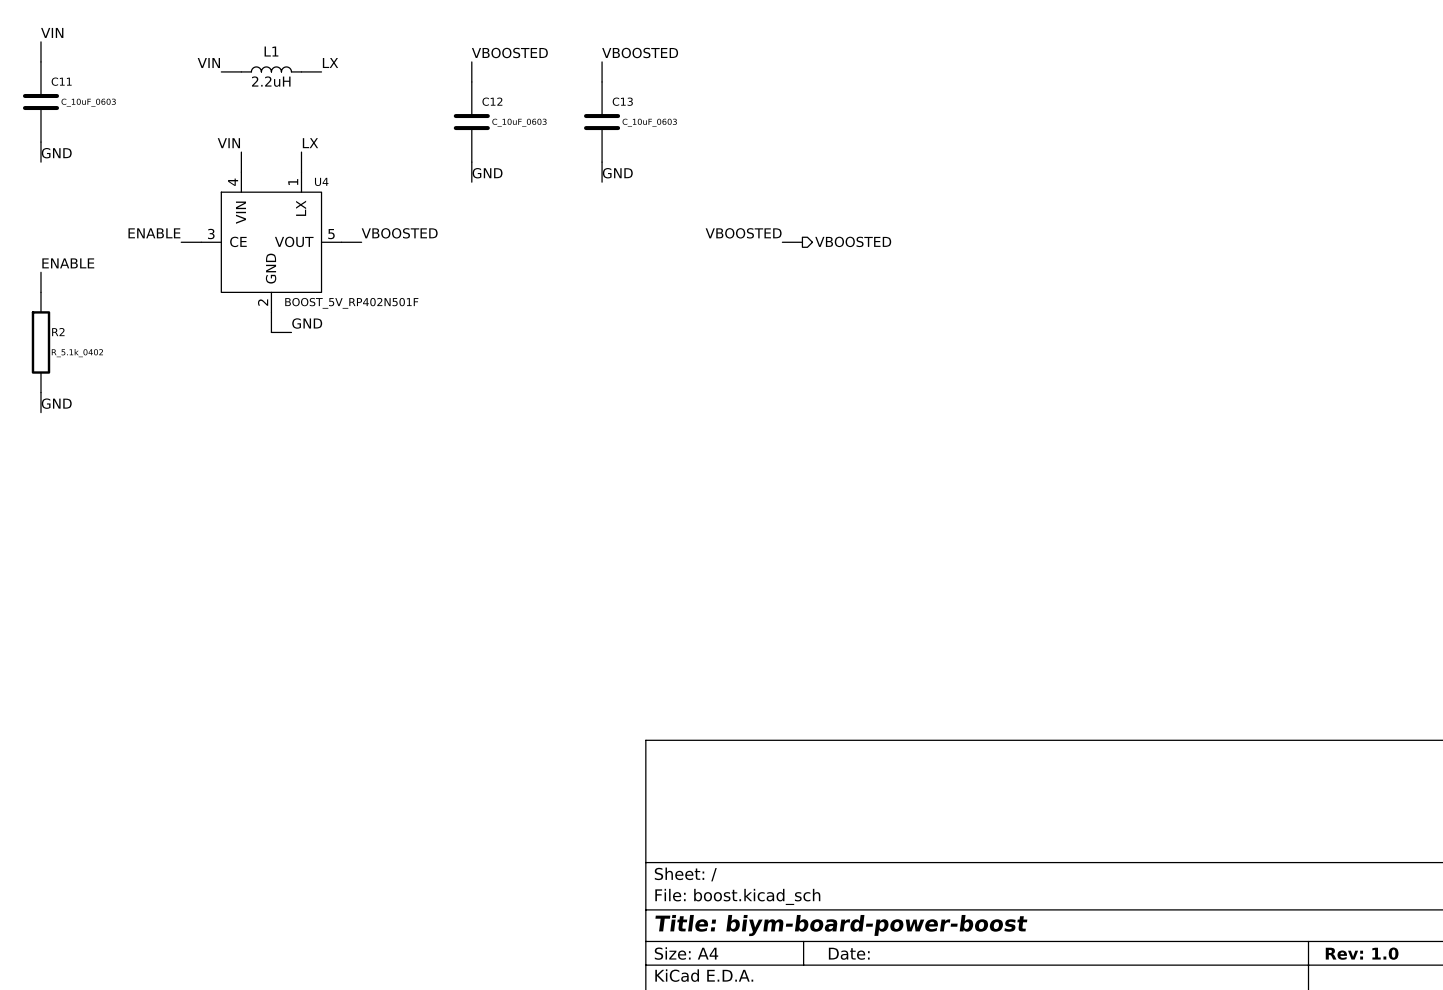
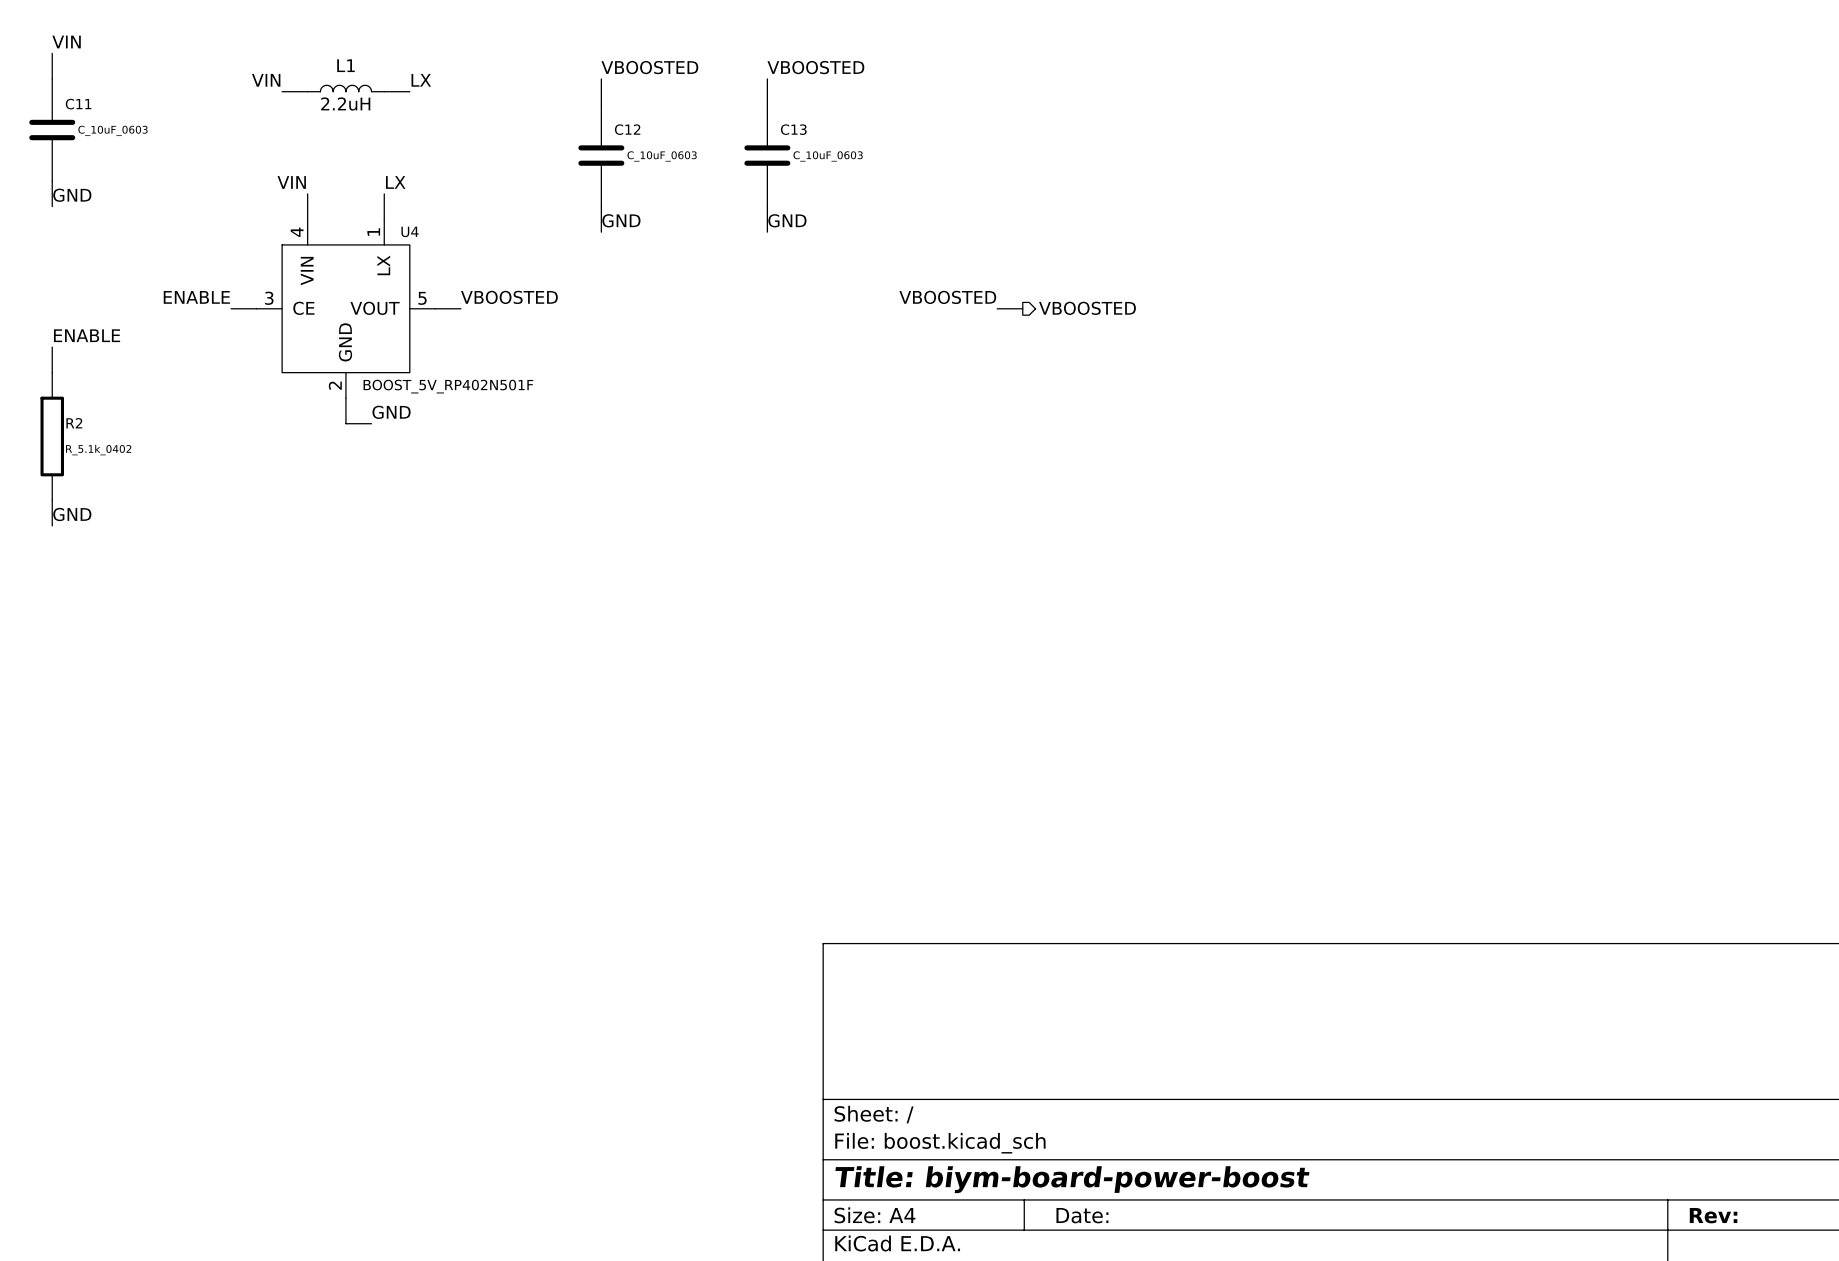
title block: Rev: 1.0 (1362, 953) -> Rev: (1713, 1215)

